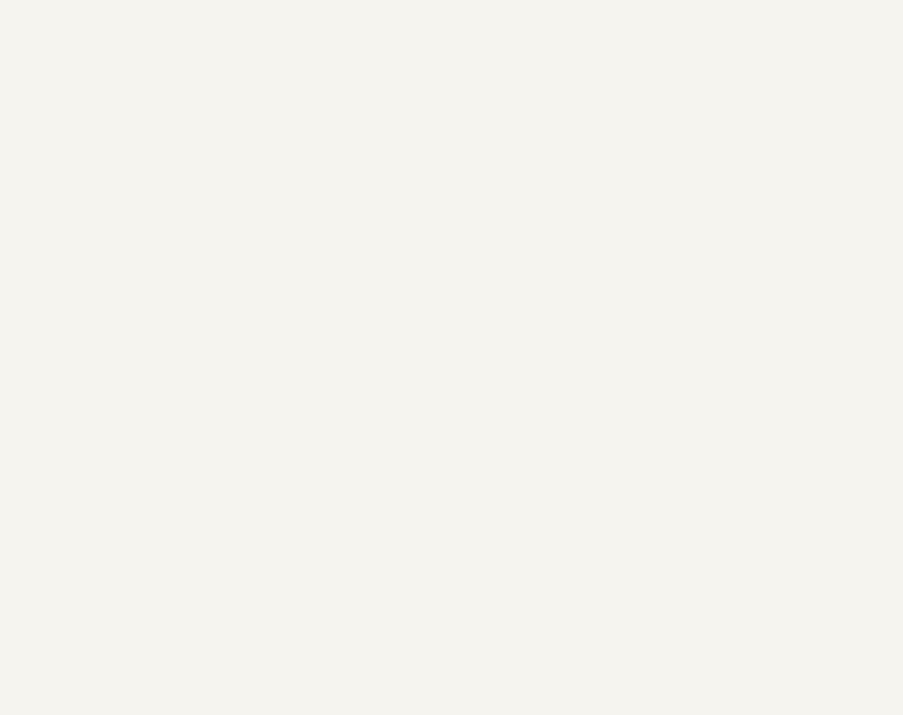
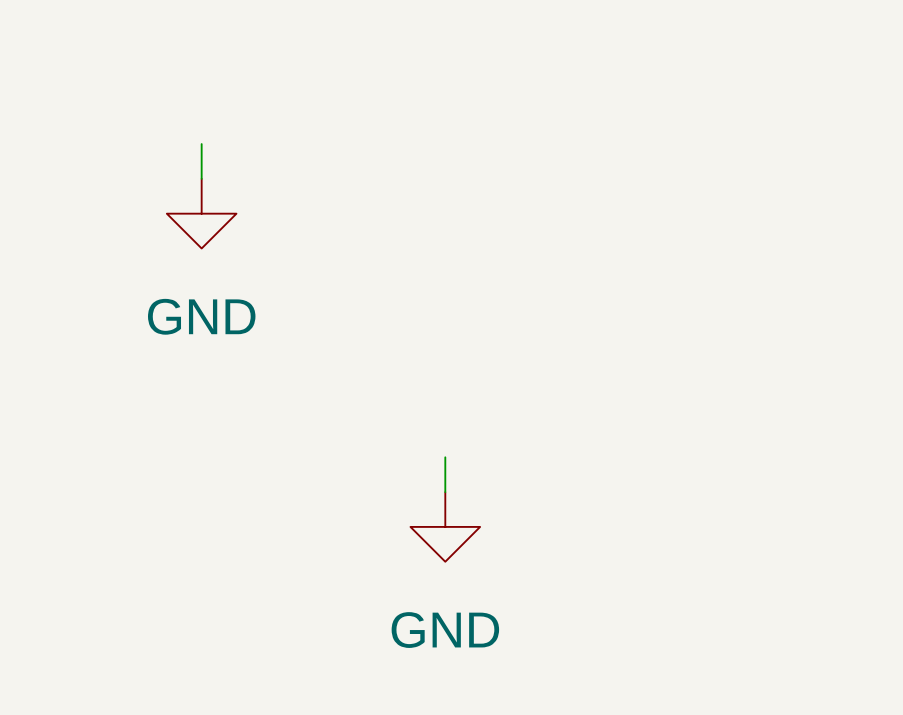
wire: none -> (201, 144) (201, 178)
power symbol: none -> GND (201, 213)
wire: none -> (445, 457) (445, 492)
power symbol: none -> GND (445, 526)

